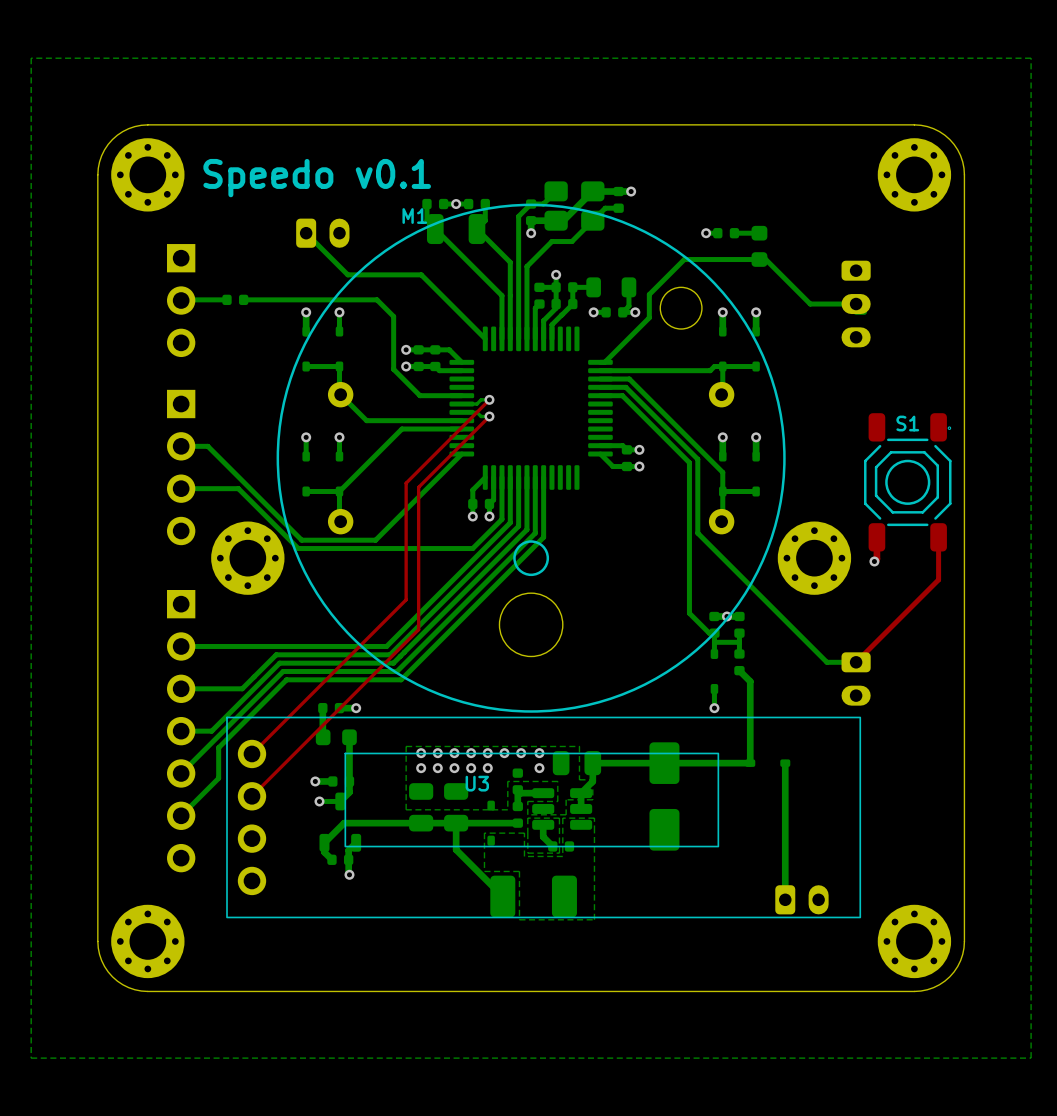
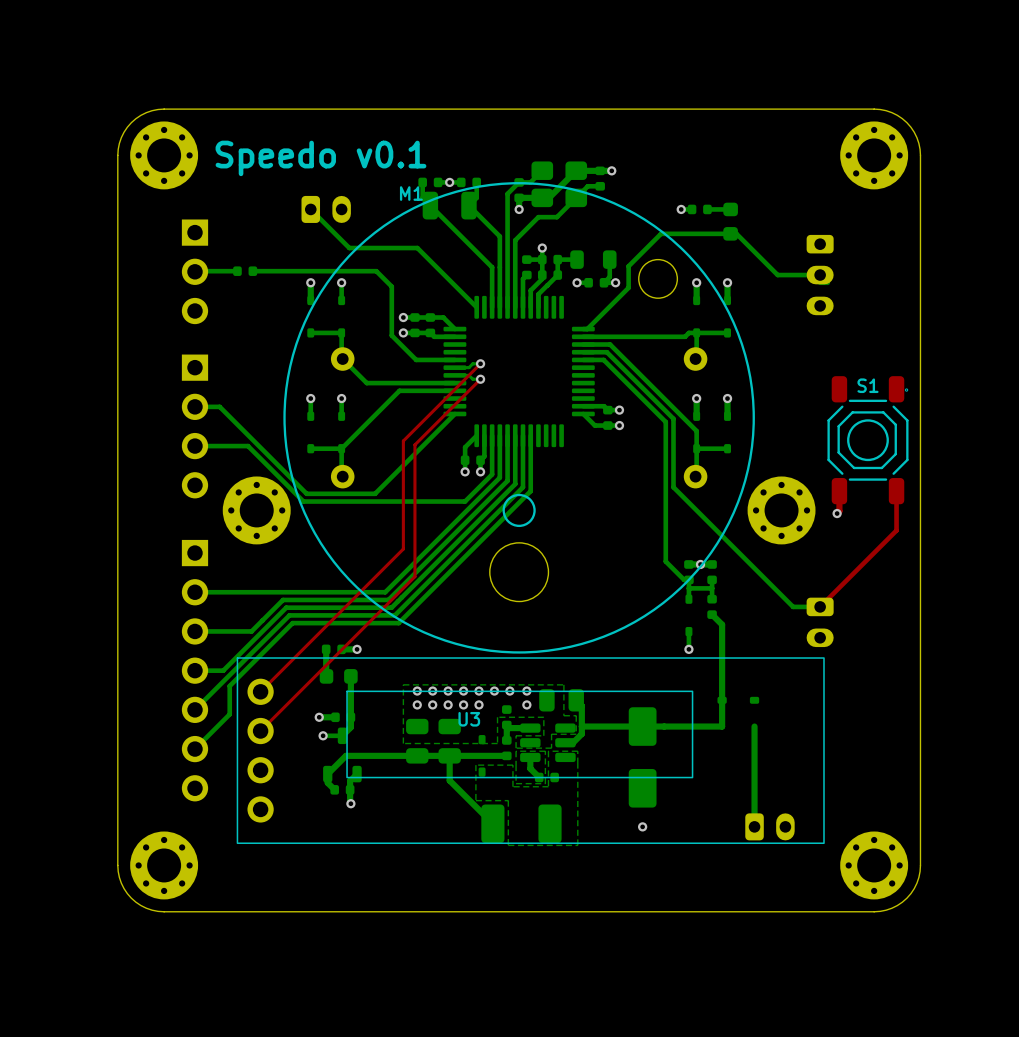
bottom zone outline: (31, 58) (1031, 58) (1031, 1058) (31, 1058) (31, 58) -> none
bottom track: none -> (576, 700) (581, 705) (581, 733) (573, 742) (565, 742)
bottom track: (750, 763) (592, 763) (592, 781) (581, 793) (581, 808) -> (722, 700) (722, 726) (581, 726)
bottom track: (785, 763) (785, 791) -> none
part position: (664, 796) -> (642, 757)
via: none -> (642, 826)

